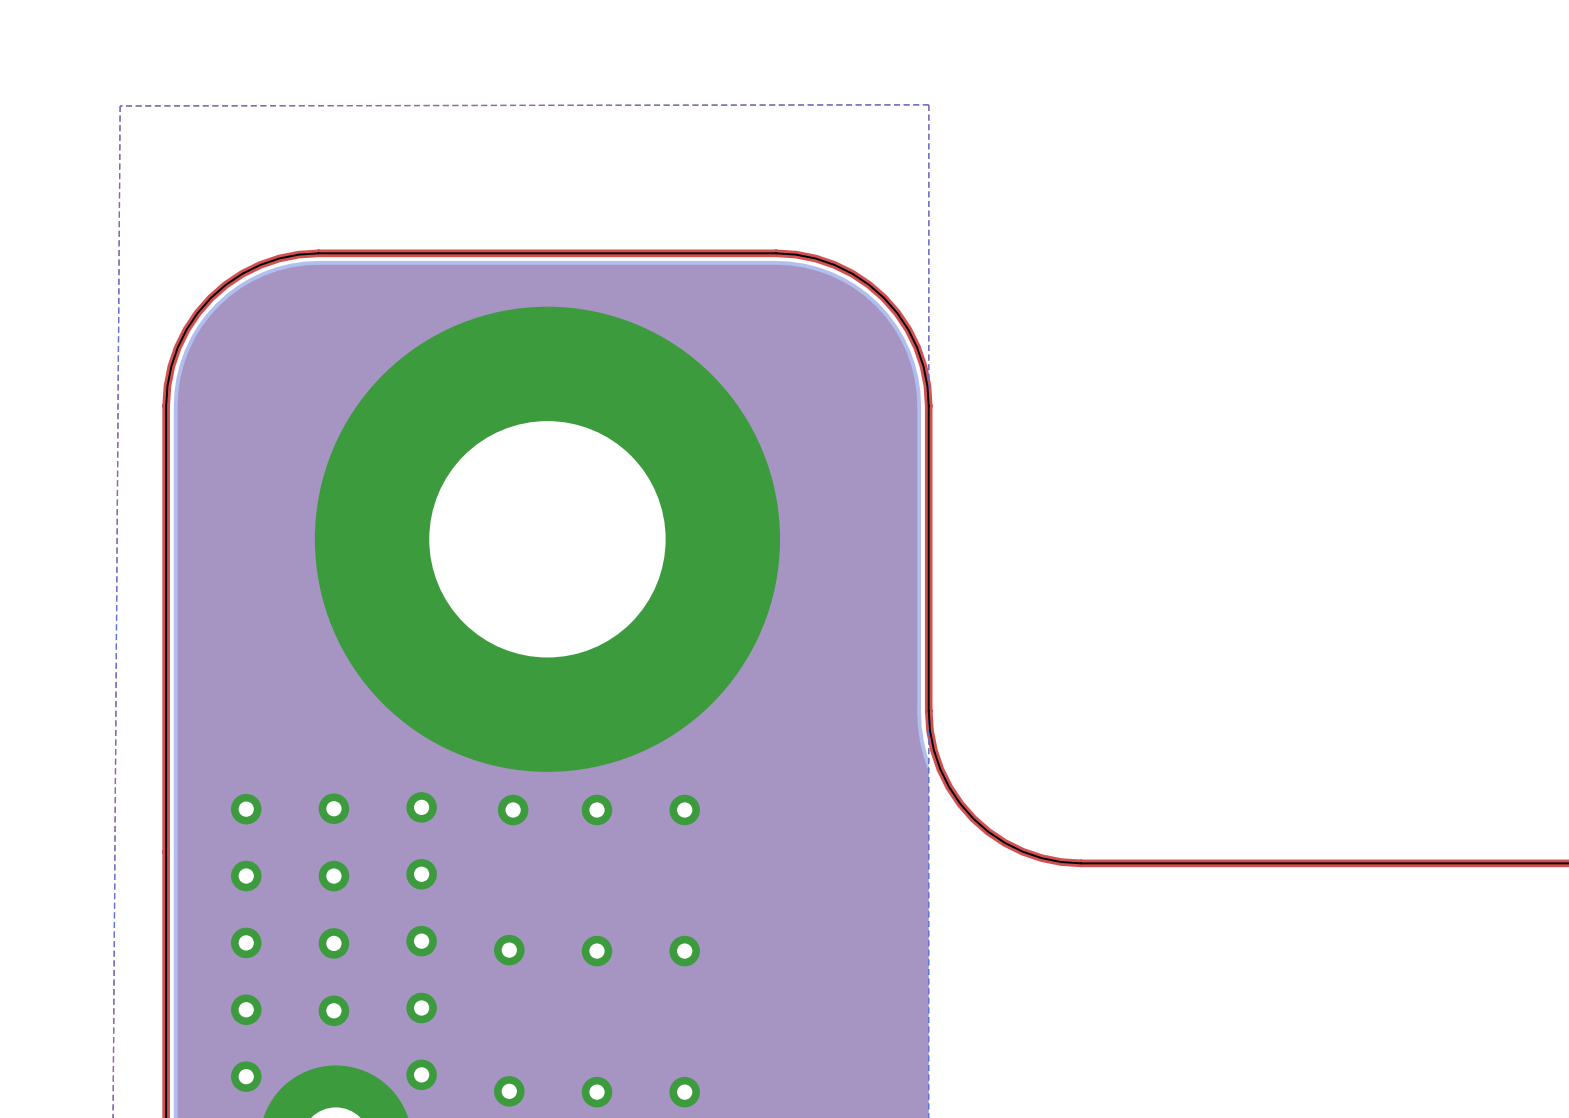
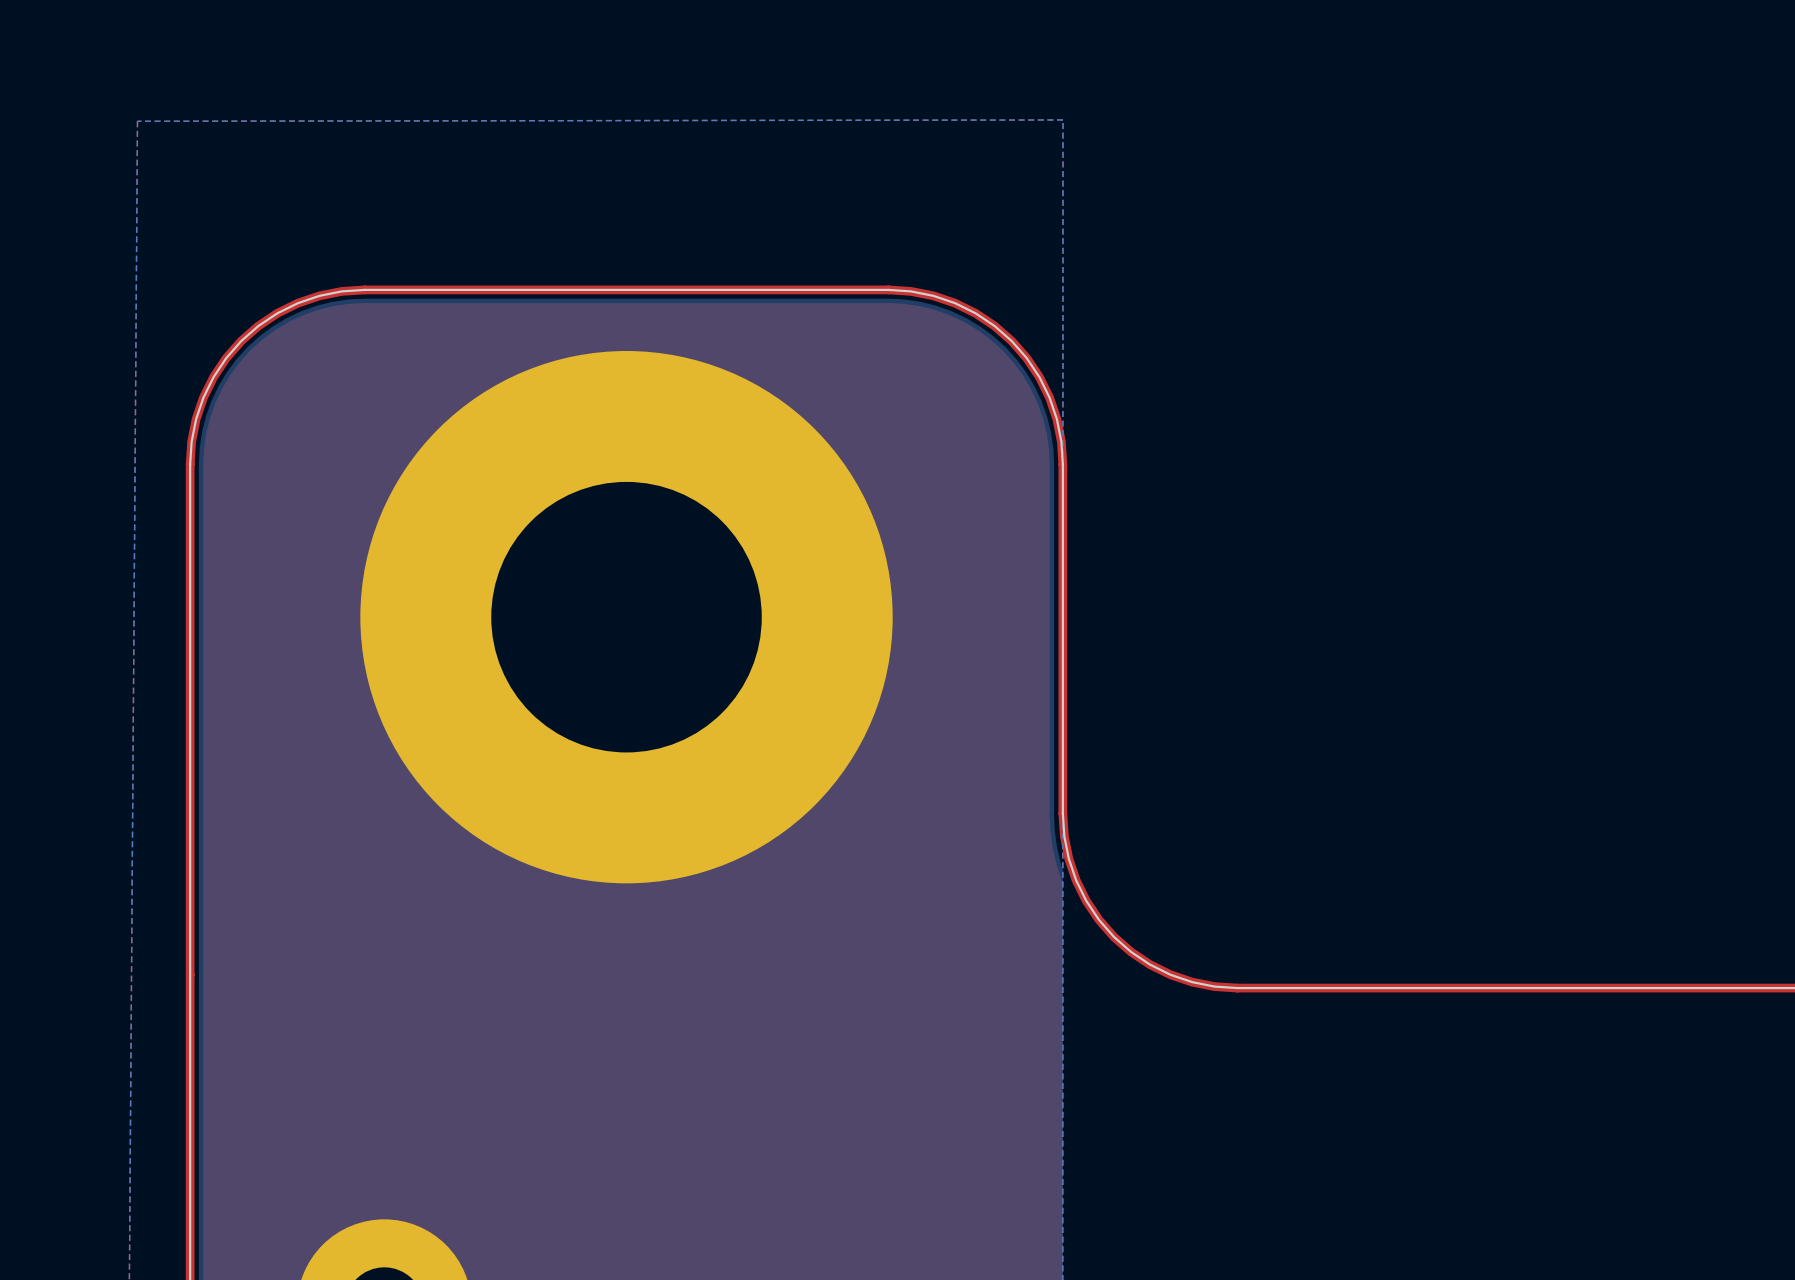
via: (421, 807) -> none
via: (333, 808) -> none
via: (246, 809) -> none
via: (513, 809) -> none
via: (597, 809) -> none
via: (684, 809) -> none
via: (421, 874) -> none
via: (246, 876) -> none
via: (333, 876) -> none
via: (421, 941) -> none
via: (246, 942) -> none
via: (333, 943) -> none
via: (509, 950) -> none
via: (597, 951) -> none
via: (684, 951) -> none
via: (421, 1008) -> none
via: (246, 1009) -> none
via: (333, 1010) -> none
via: (421, 1074) -> none
via: (246, 1076) -> none
via: (509, 1091) -> none
via: (597, 1092) -> none
via: (684, 1092) -> none

